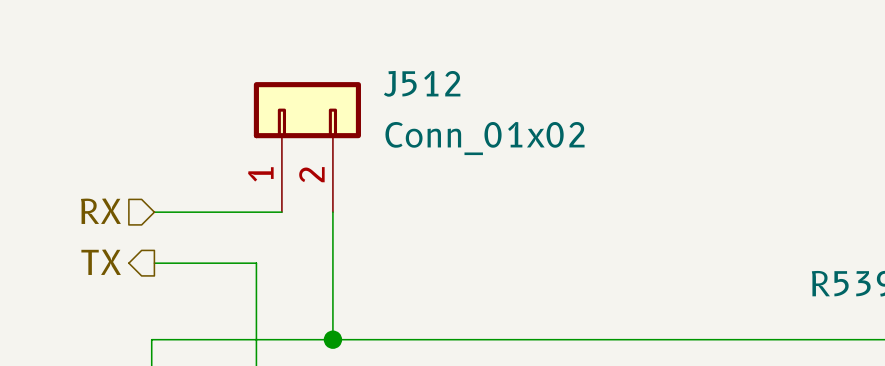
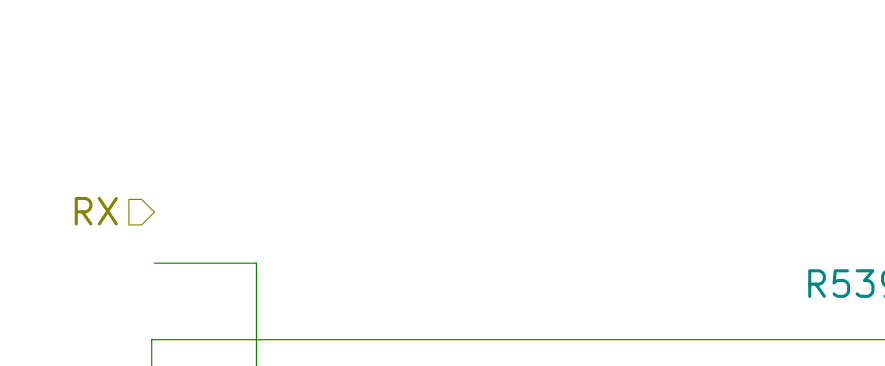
J512: Conn_01x02 (307, 147) -> none
wire: (154, 212) (281, 212) -> none
wire: (332, 212) (332, 339) -> none
hierarchical label: TX (101, 262) -> none
junction: (332, 339) -> none

